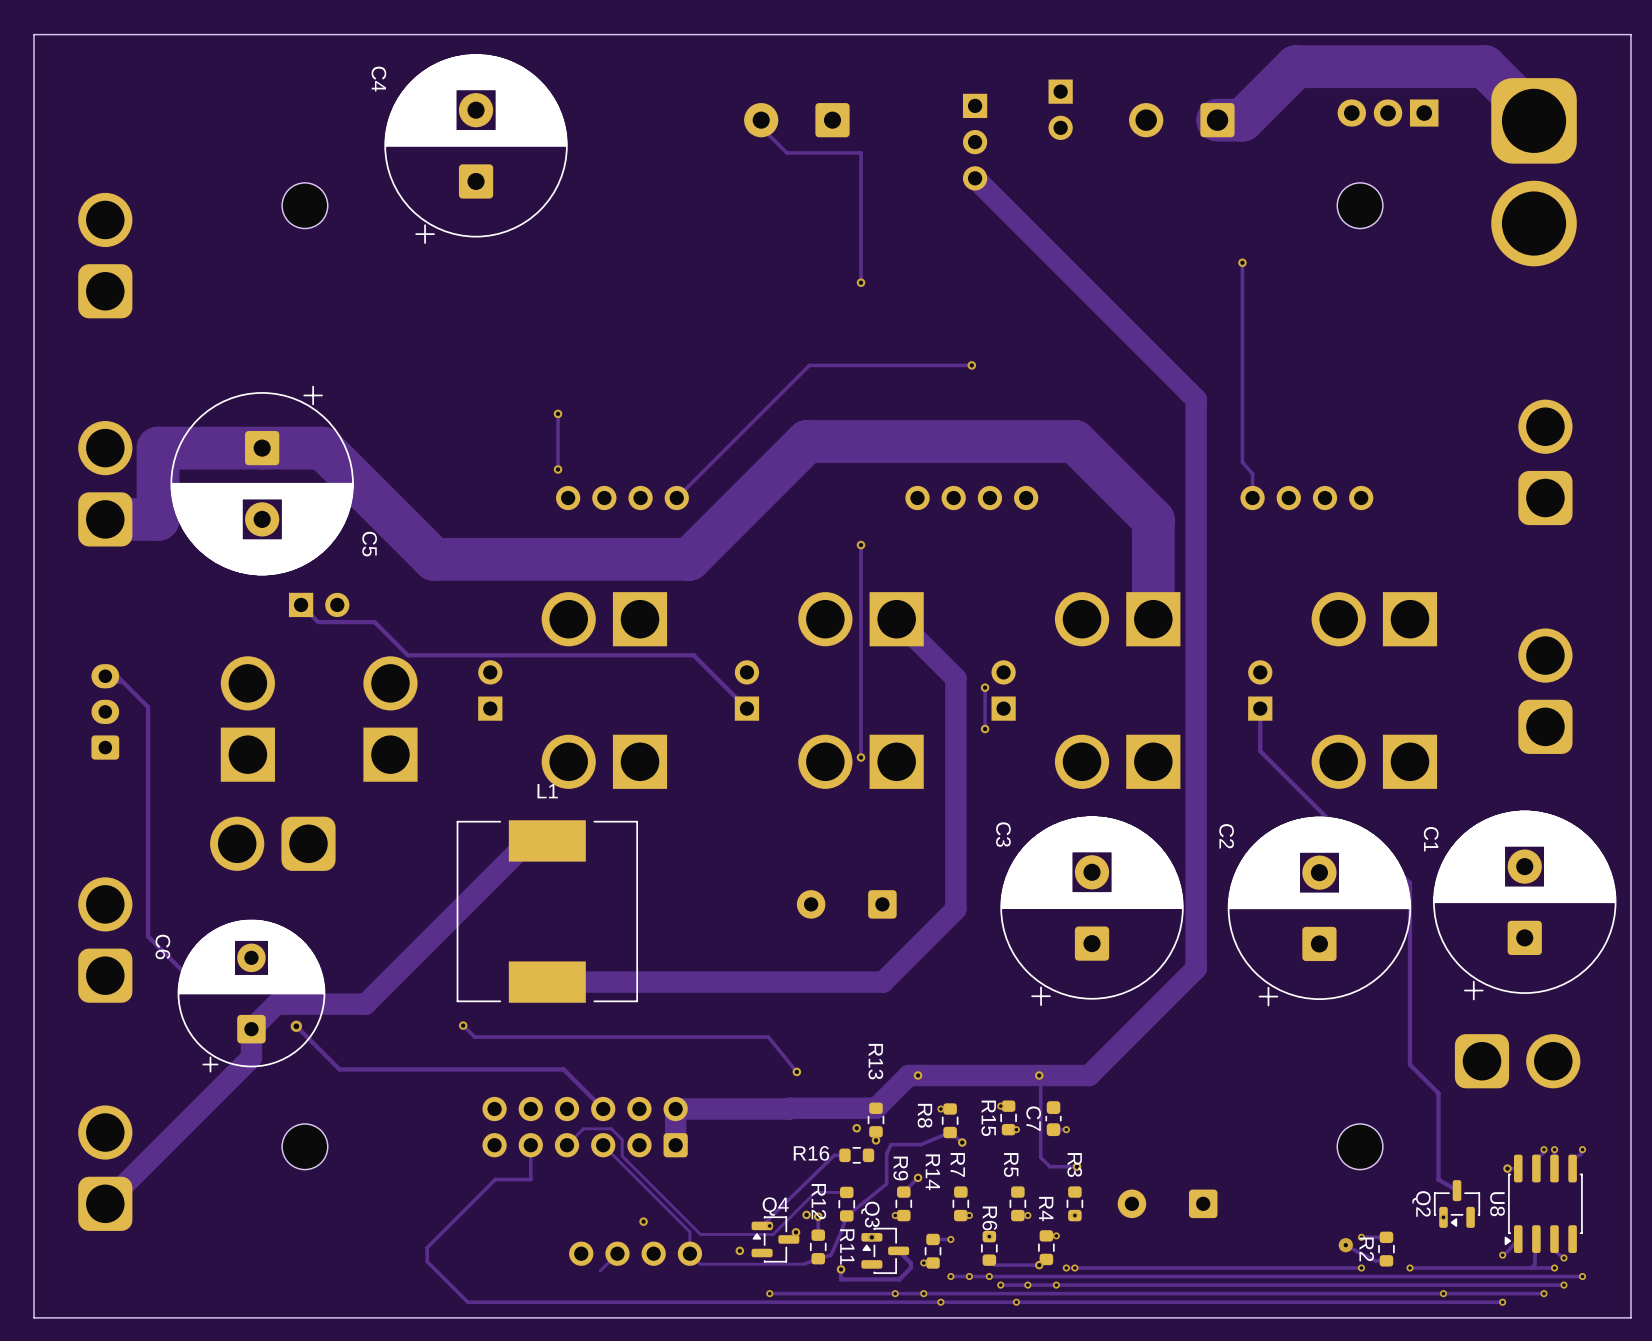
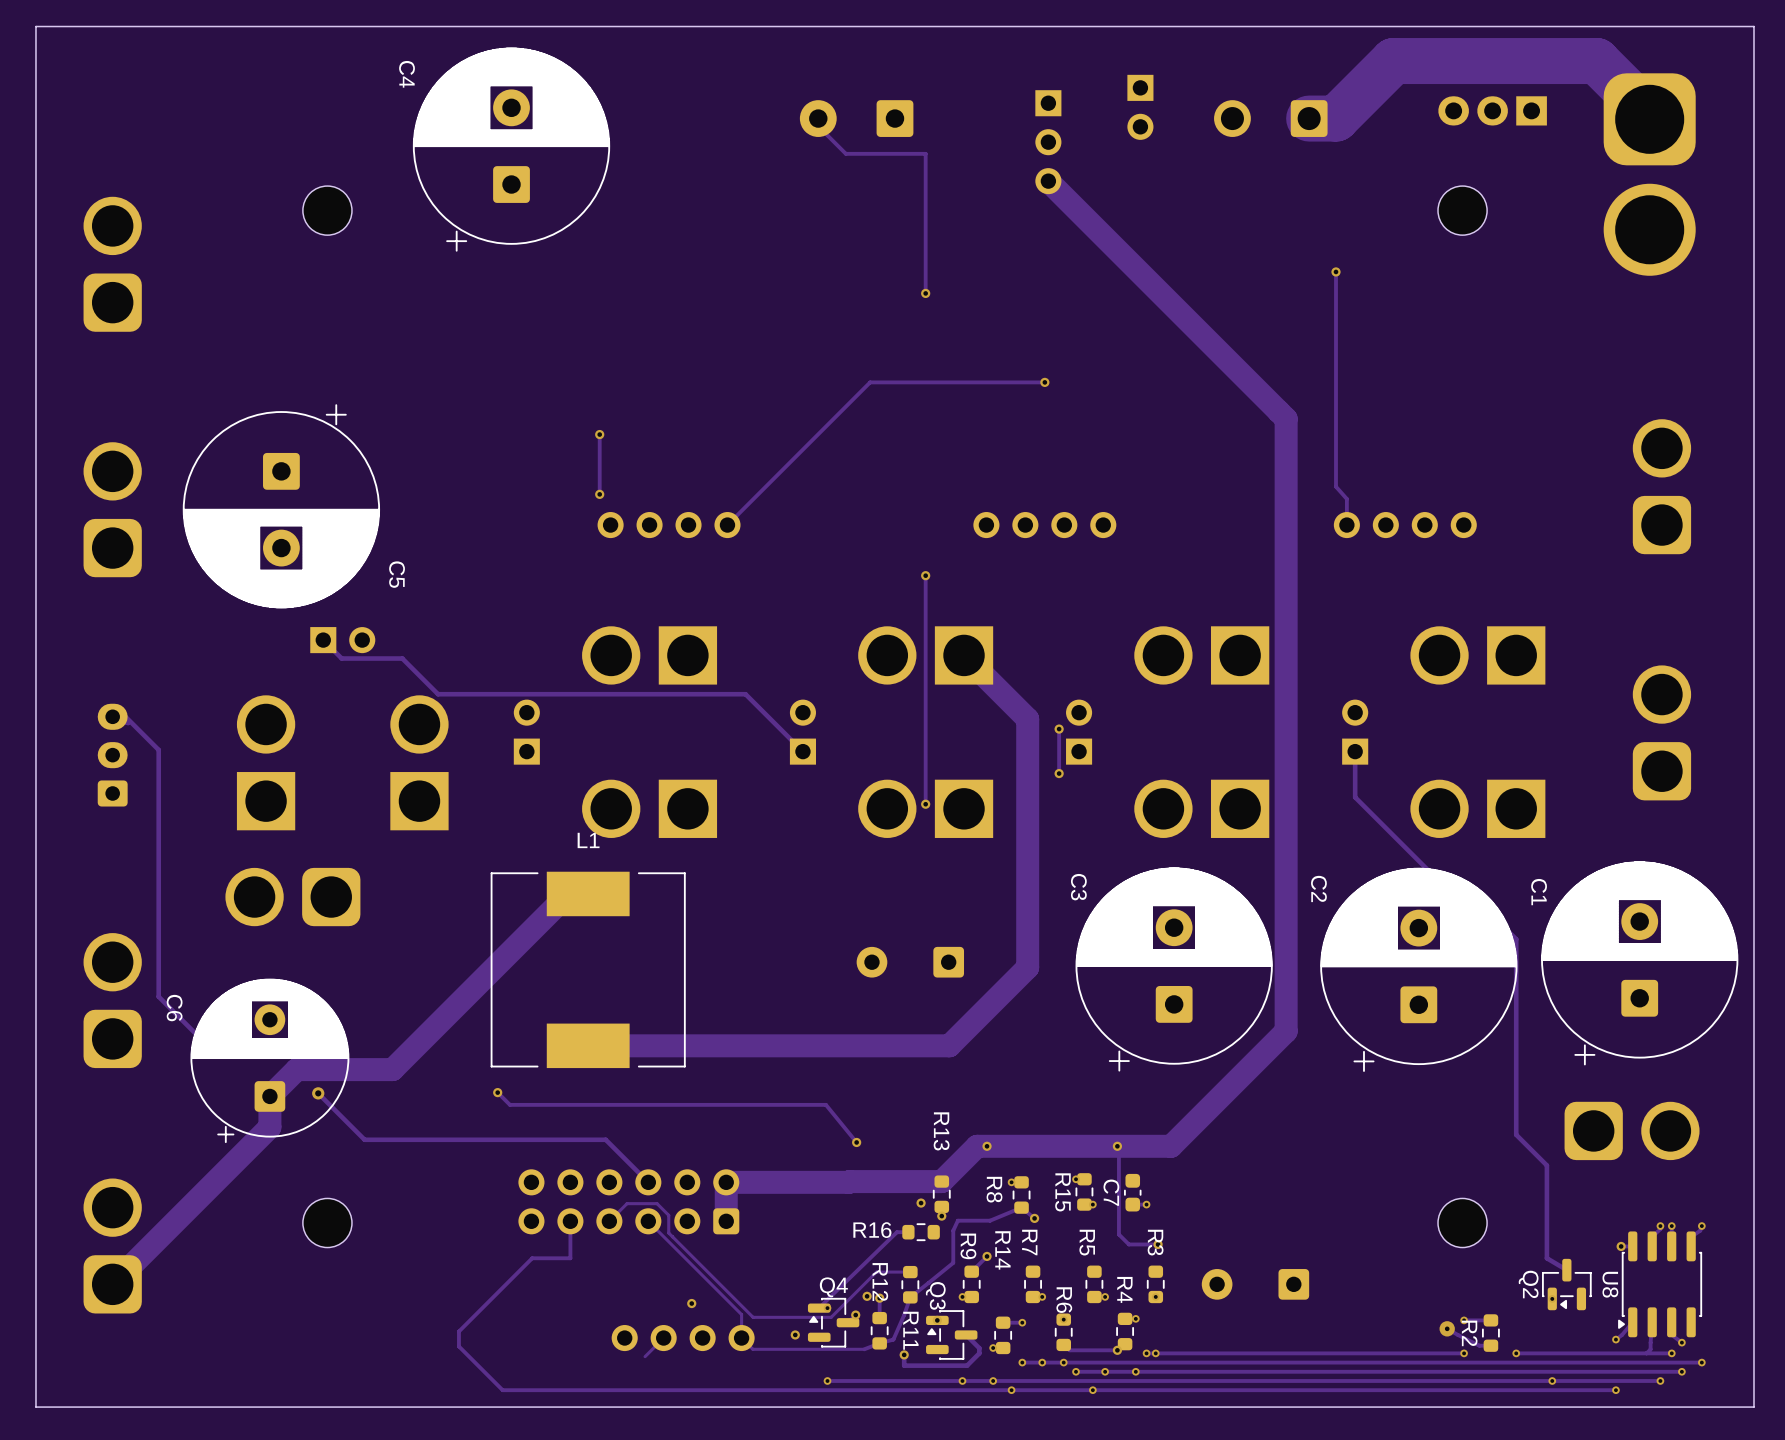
track: (105, 519) (158, 519) (158, 448) (322, 448) (433, 559) (689, 559) (806, 441) (1074, 441) (1153, 519) (1153, 619) -> none

